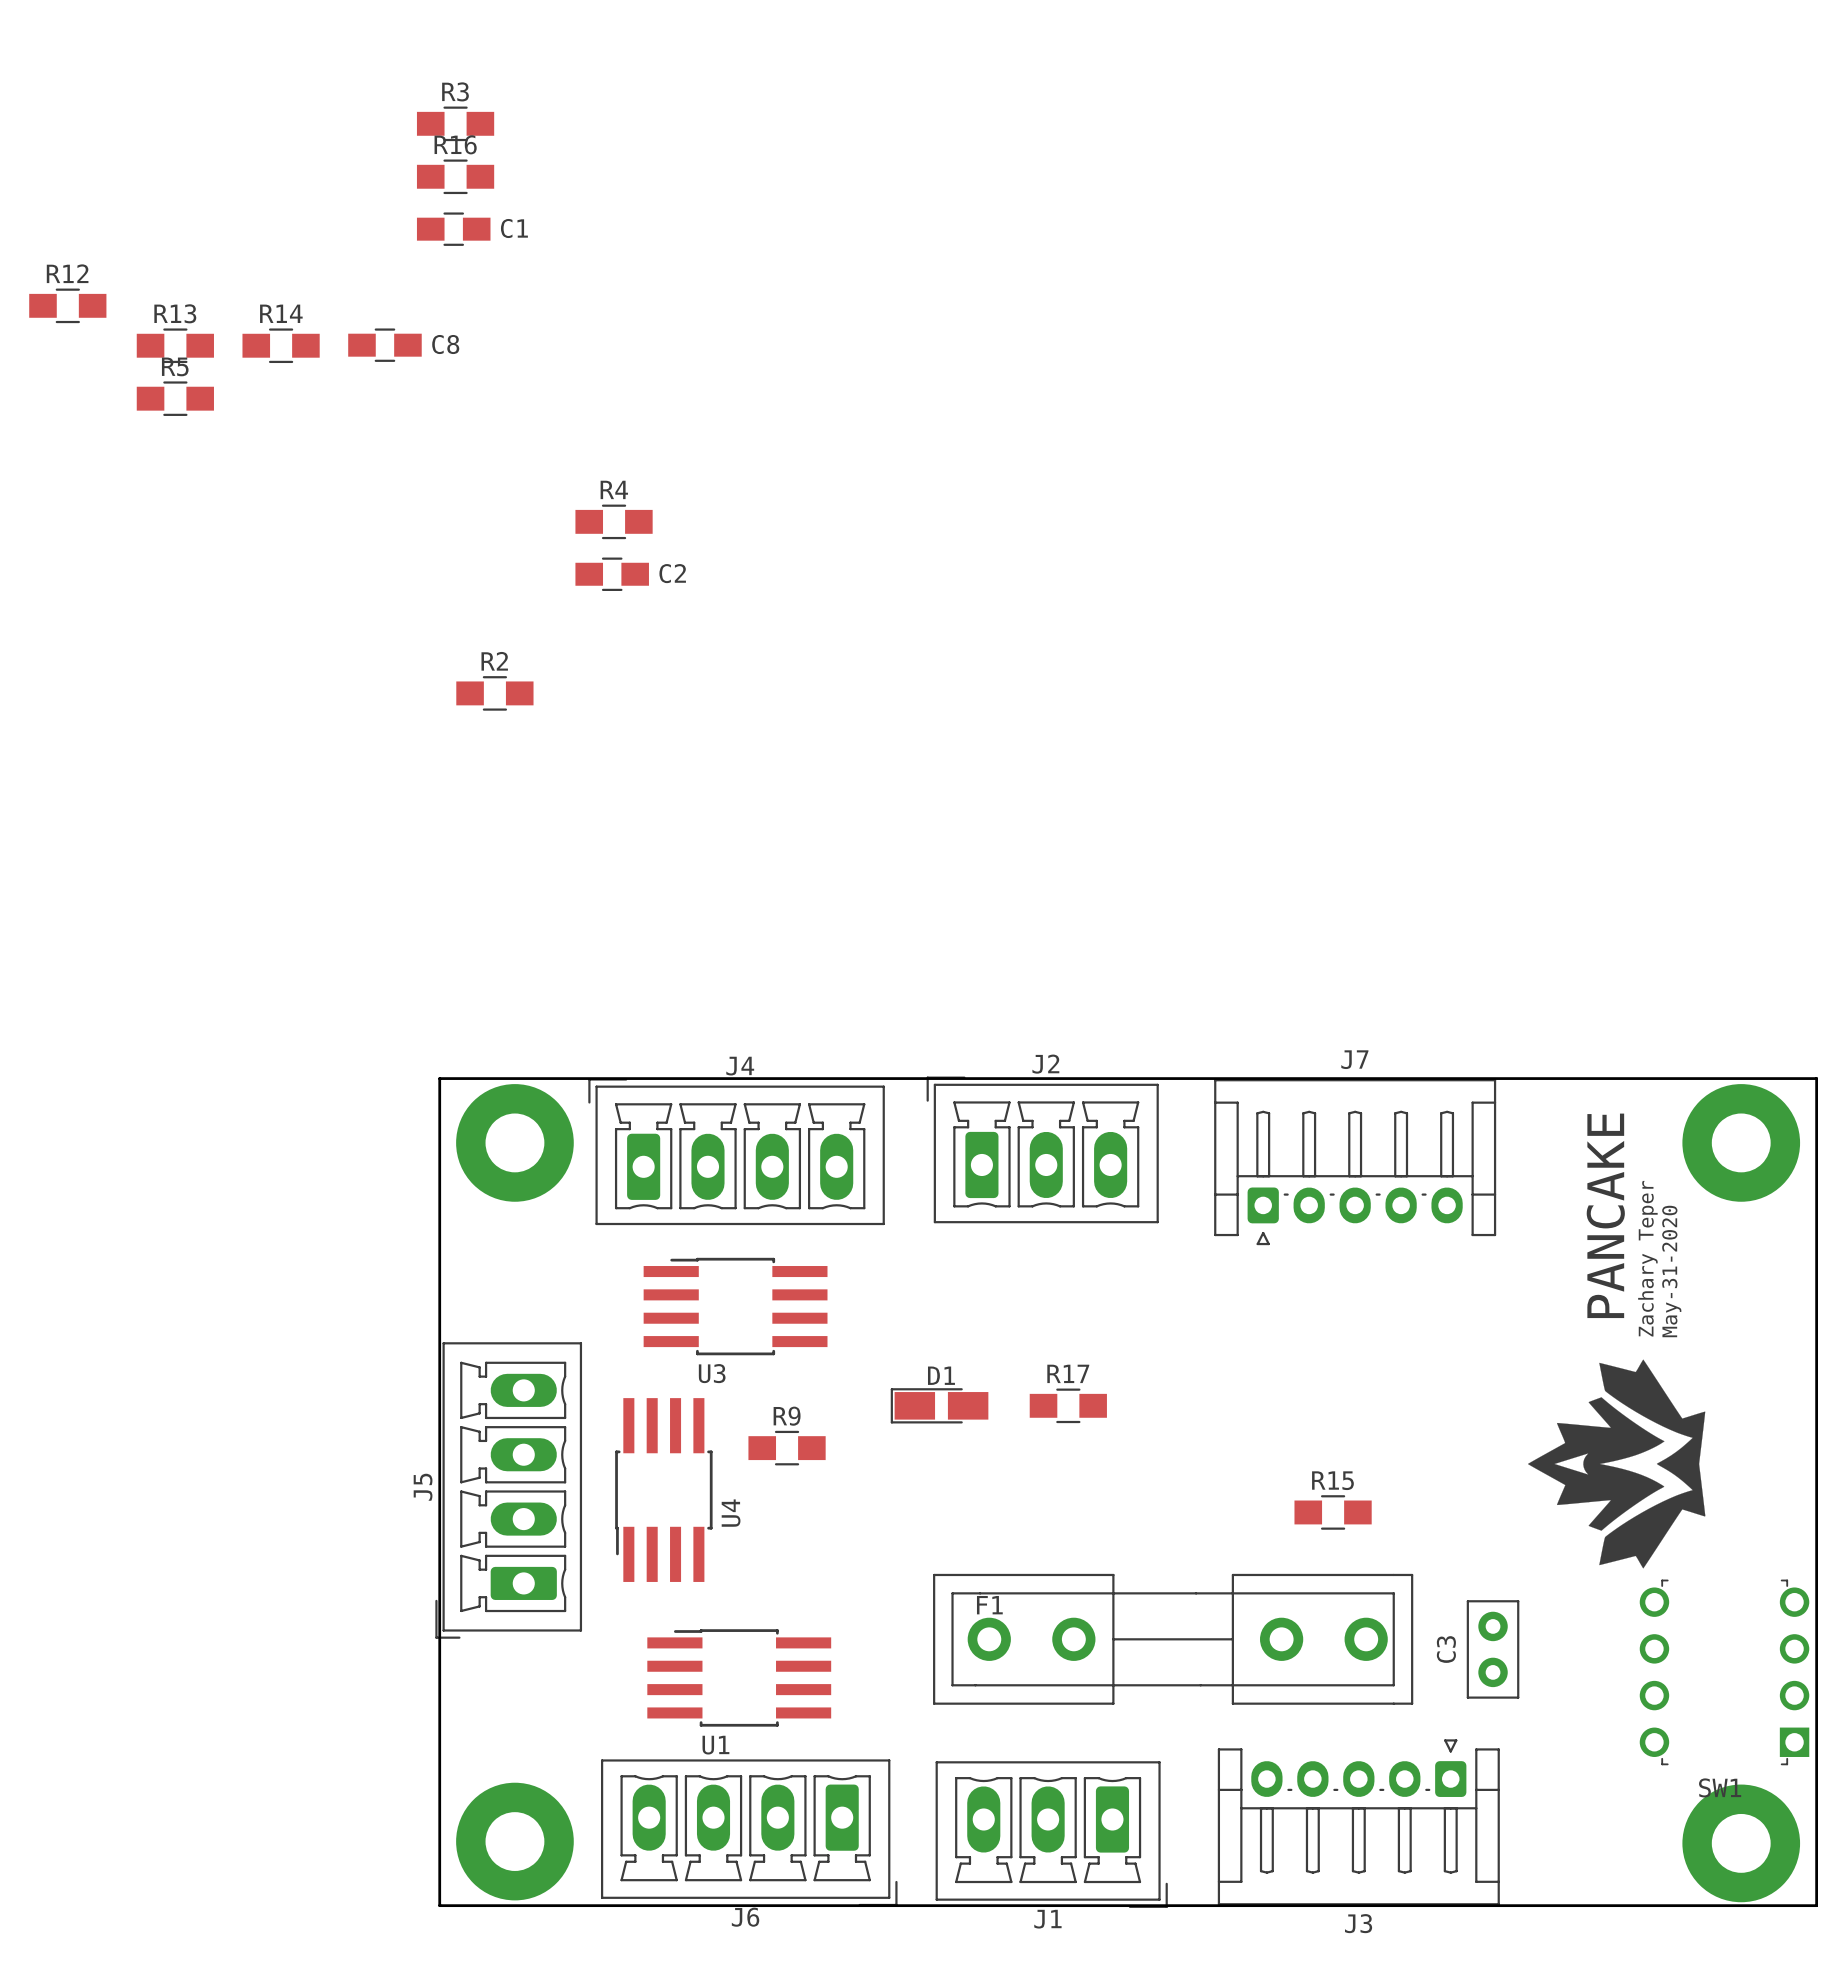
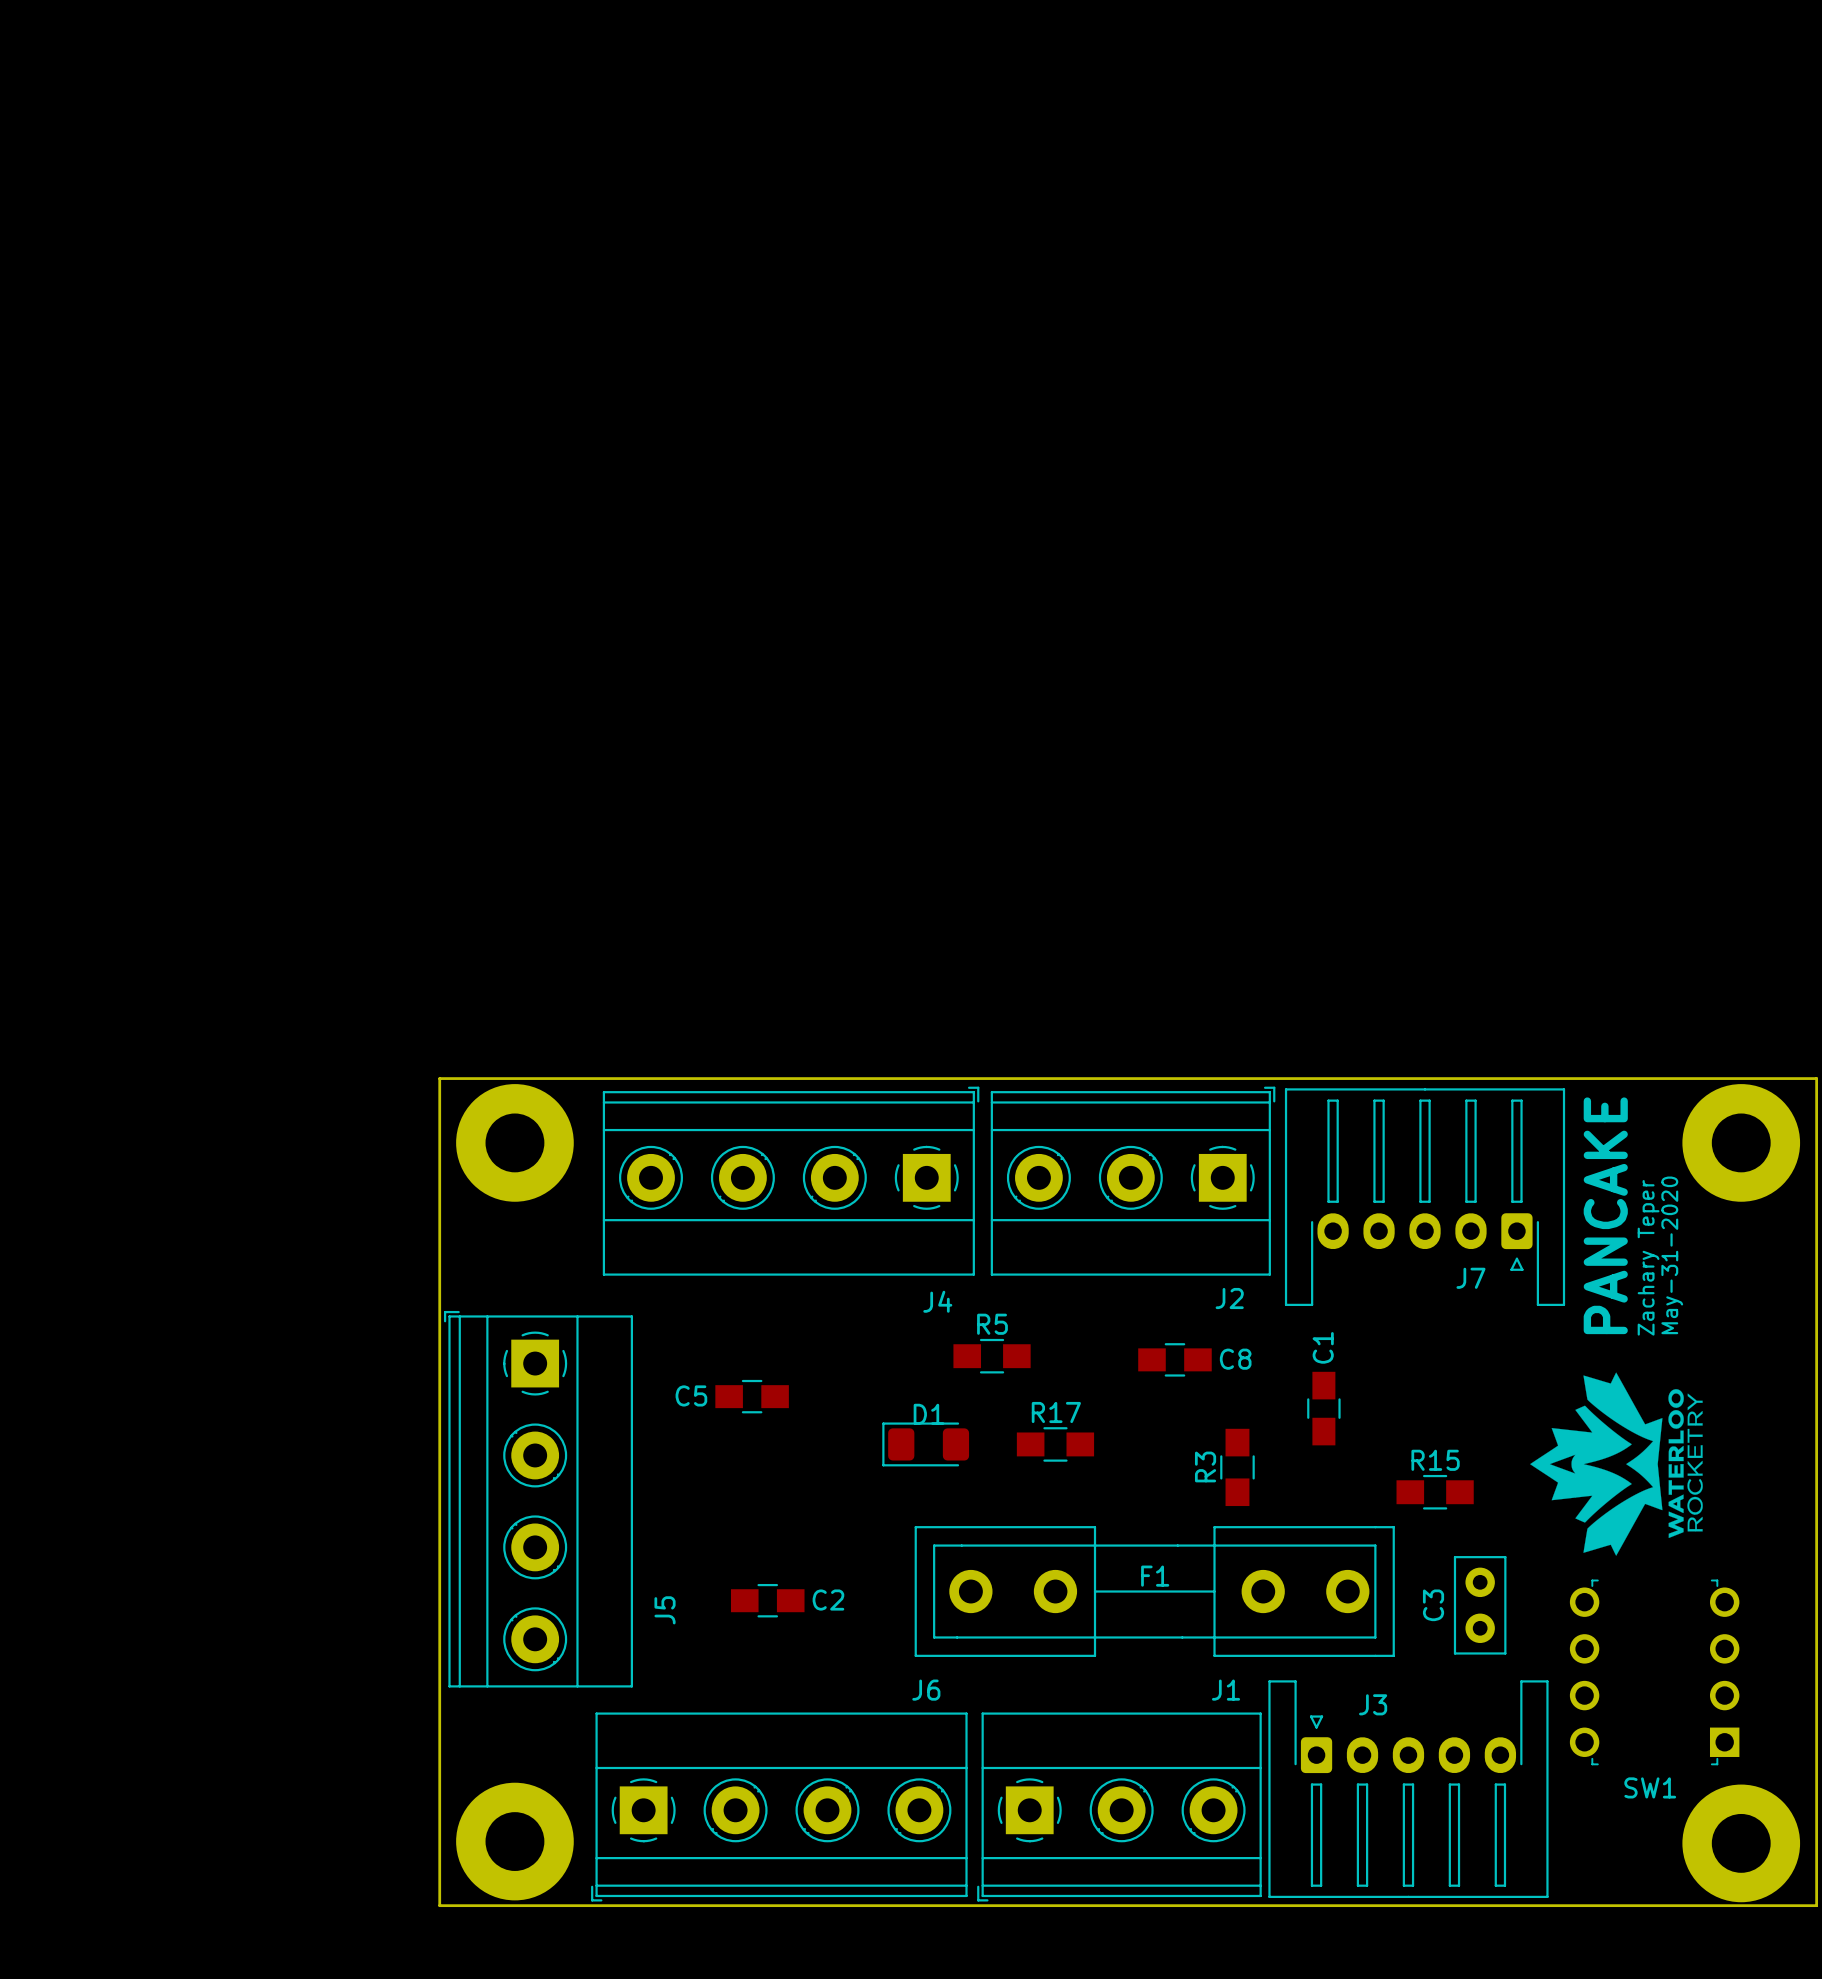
R3 name position: R3 (455, 91) -> R3 (1205, 1466)
R3 rotation: 0° (455, 123) -> 90° clockwise (1237, 1467)
R3 position: (455, 123) -> (1237, 1467)
R16: (455, 176) -> none
C1 name position: C1 (514, 228) -> C1 (1323, 1347)
C1 rotation: 0° (453, 229) -> 90° clockwise (1323, 1408)
C1 position: (453, 229) -> (1323, 1408)
R12: (67, 305) -> none
R13: (175, 345) -> none
R14: (281, 345) -> none
C8 position: (384, 345) -> (1174, 1359)
R5 position: (175, 398) -> (992, 1356)
R4: (614, 521) -> none
C2 position: (612, 574) -> (767, 1600)
R2: (494, 693) -> none
J7 name position: J7 (1354, 1059) -> J7 (1470, 1278)
J2 name position: J2 (1045, 1064) -> J2 (1229, 1298)
J4 name position: J4 (740, 1066) -> J4 (937, 1301)
J2 footprint: [926, 1076, 1159, 1224] -> [990, 1086, 1276, 1276]
J4 footprint: [588, 1078, 885, 1226] -> [602, 1086, 980, 1276]
J7 footprint: [1214, 1079, 1497, 1246] -> [1284, 1088, 1566, 1306]
U3: (735, 1306) -> none
J5 footprint: [435, 1342, 583, 1639] -> [443, 1310, 634, 1688]
drawing shape: [1527, 1359, 1706, 1569] -> [1530, 1372, 1703, 1556]
D1 footprint: [890, 1388, 989, 1424] -> [882, 1422, 970, 1467]
C5: none -> (752, 1396)
R17 position: (1068, 1405) -> (1055, 1444)
R9: (787, 1448) -> none
J5 name position: J5 (423, 1487) -> J5 (665, 1610)
U4: (663, 1490) -> none
R15 position: (1333, 1512) -> (1435, 1492)
F1 name position: F1 (989, 1605) -> F1 (1155, 1576)
F1 position: (1173, 1639) -> (1154, 1591)
C3 position: (1493, 1649) -> (1480, 1605)
SW1 position: (1724, 1672) -> (1654, 1672)
U1: (739, 1677) -> none
J3 footprint: [1217, 1739, 1500, 1906] -> [1268, 1680, 1549, 1899]
J6 footprint: [600, 1759, 898, 1907] -> [591, 1712, 968, 1902]
J1 footprint: [935, 1761, 1168, 1908] -> [977, 1712, 1262, 1902]
J6 name position: J6 (745, 1917) -> J6 (926, 1690)
J1 name position: J1 (1047, 1919) -> J1 (1226, 1690)
J3 name position: J3 (1358, 1923) -> J3 (1373, 1704)

